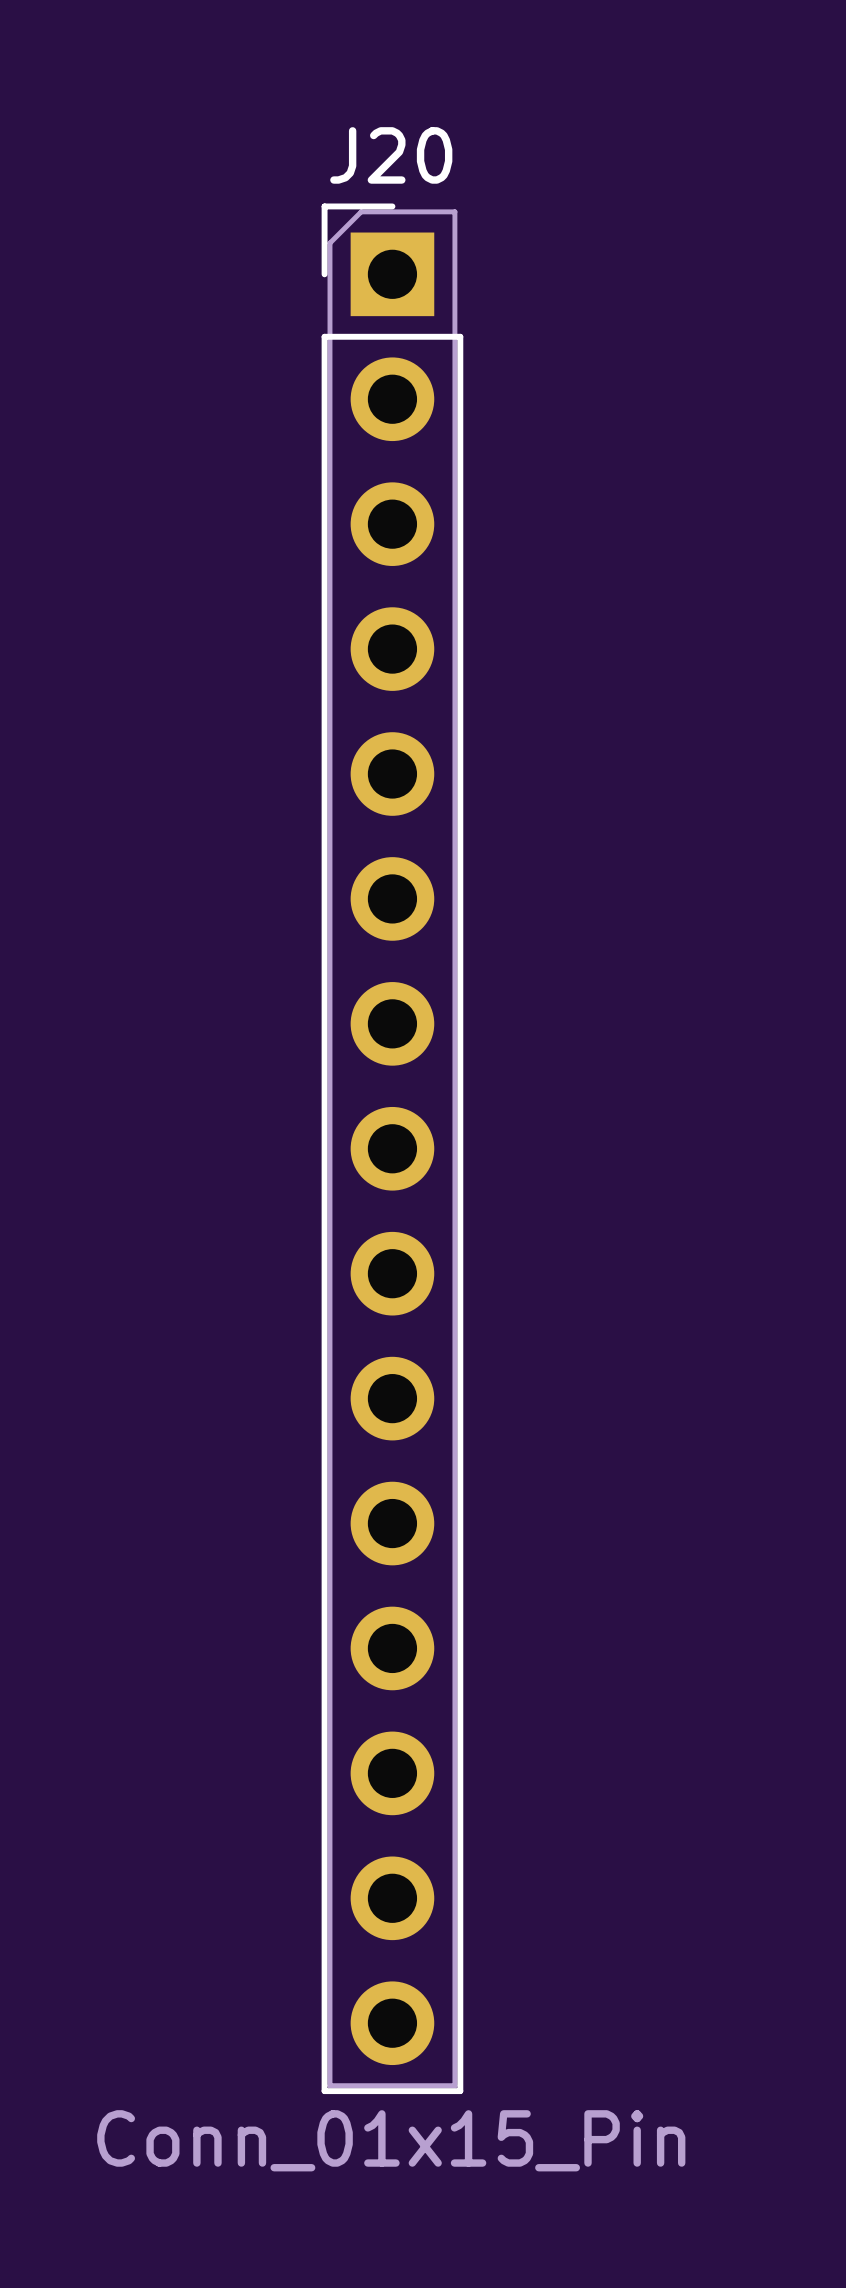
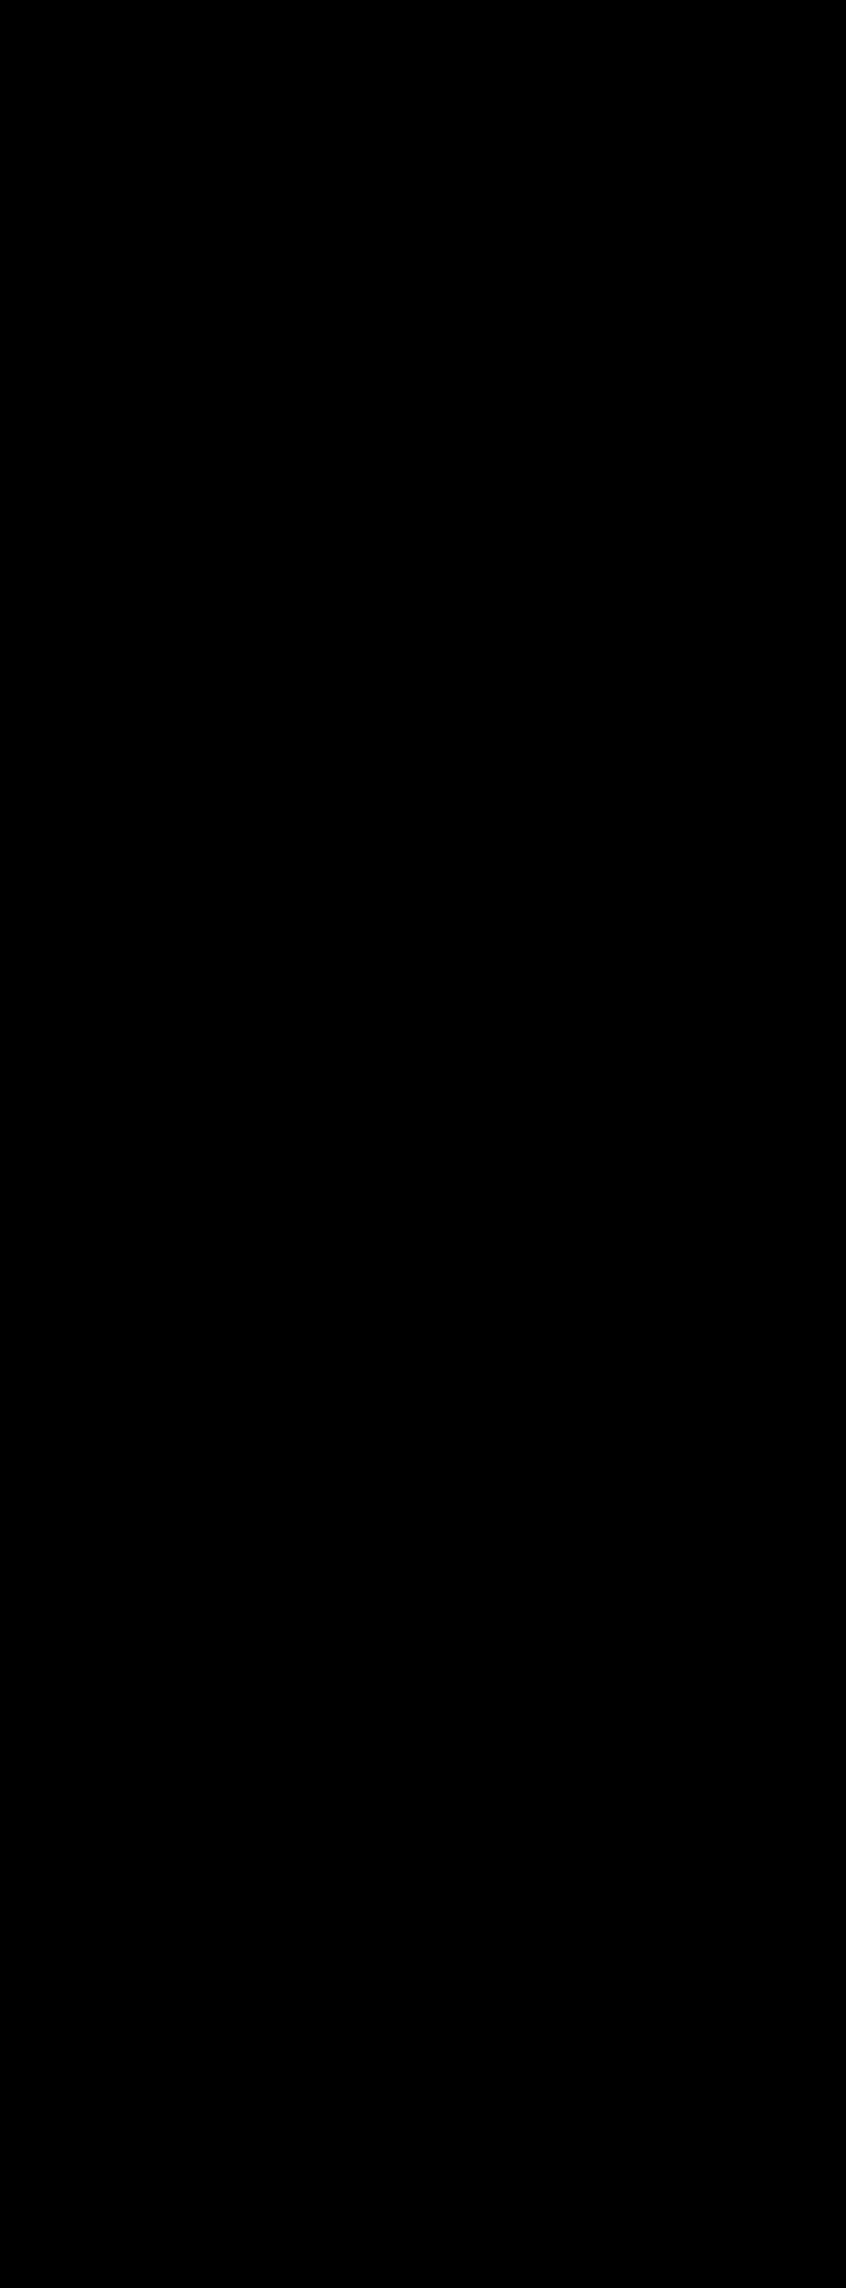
J20: Conn_01x15_Pin (392, 1148) -> none

